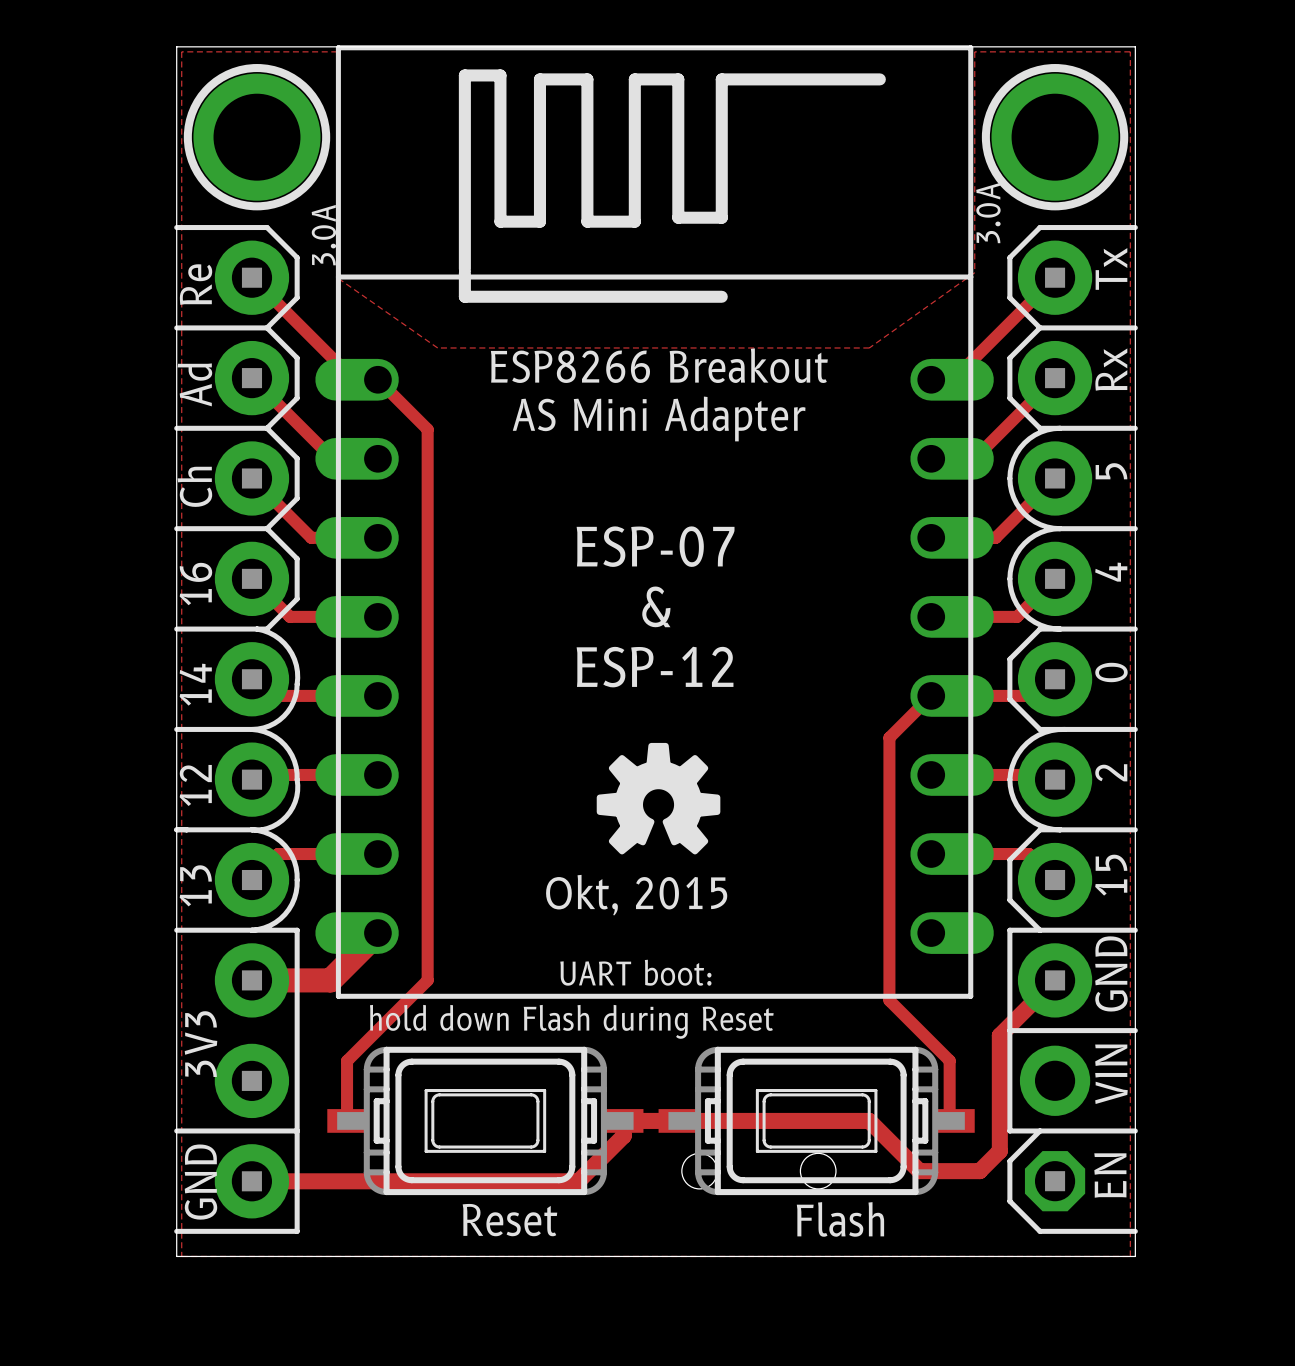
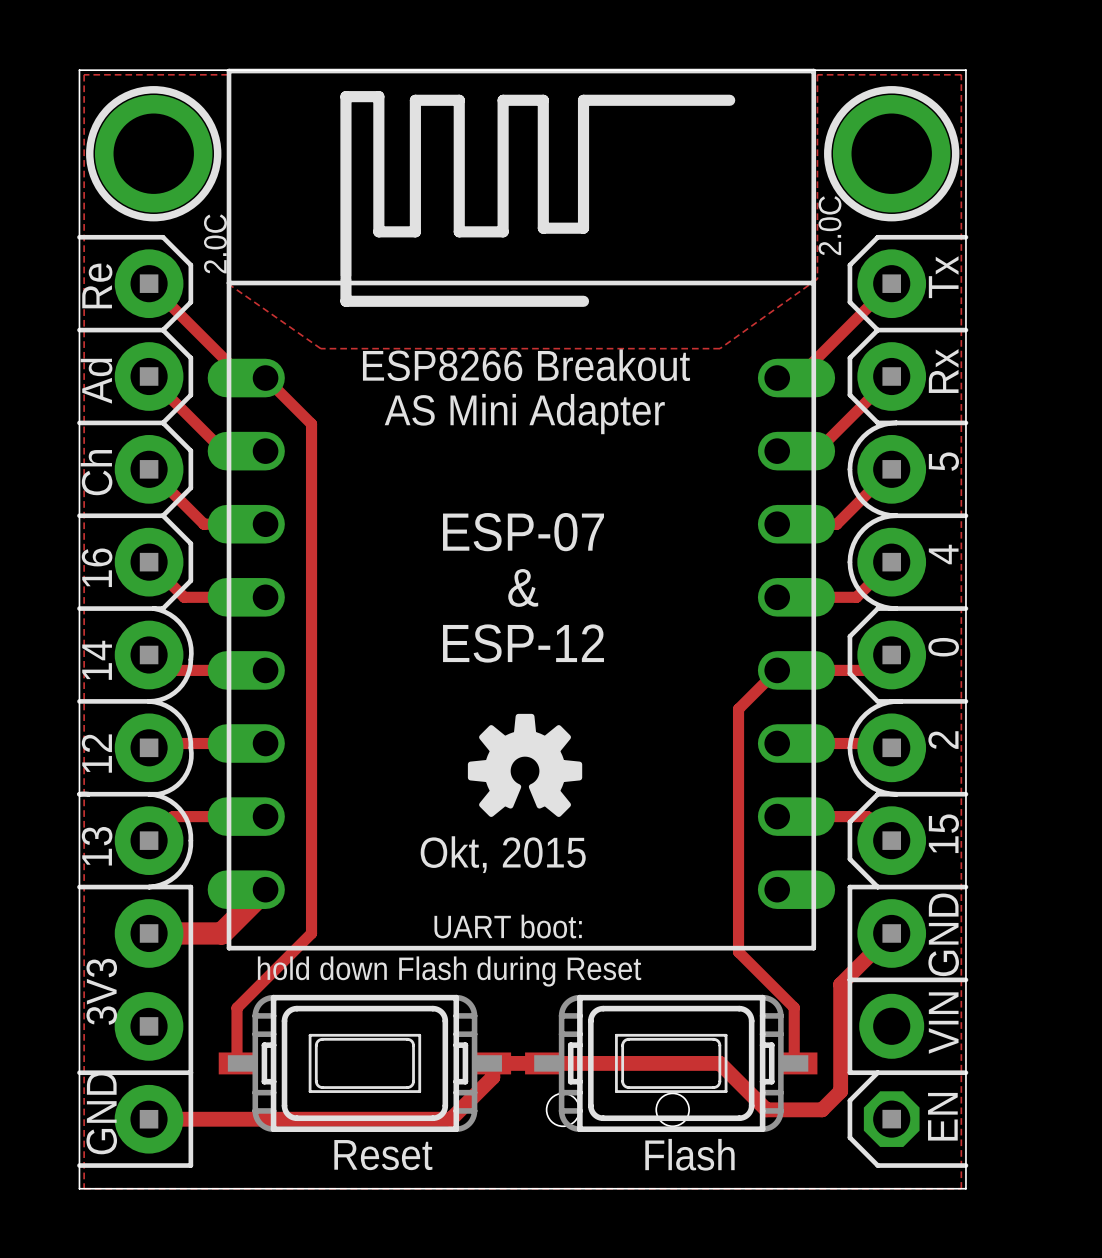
text: 3.0A (988, 212) -> 2.0C (829, 225)
text: 3.0A (323, 235) -> 2.0C (215, 243)

